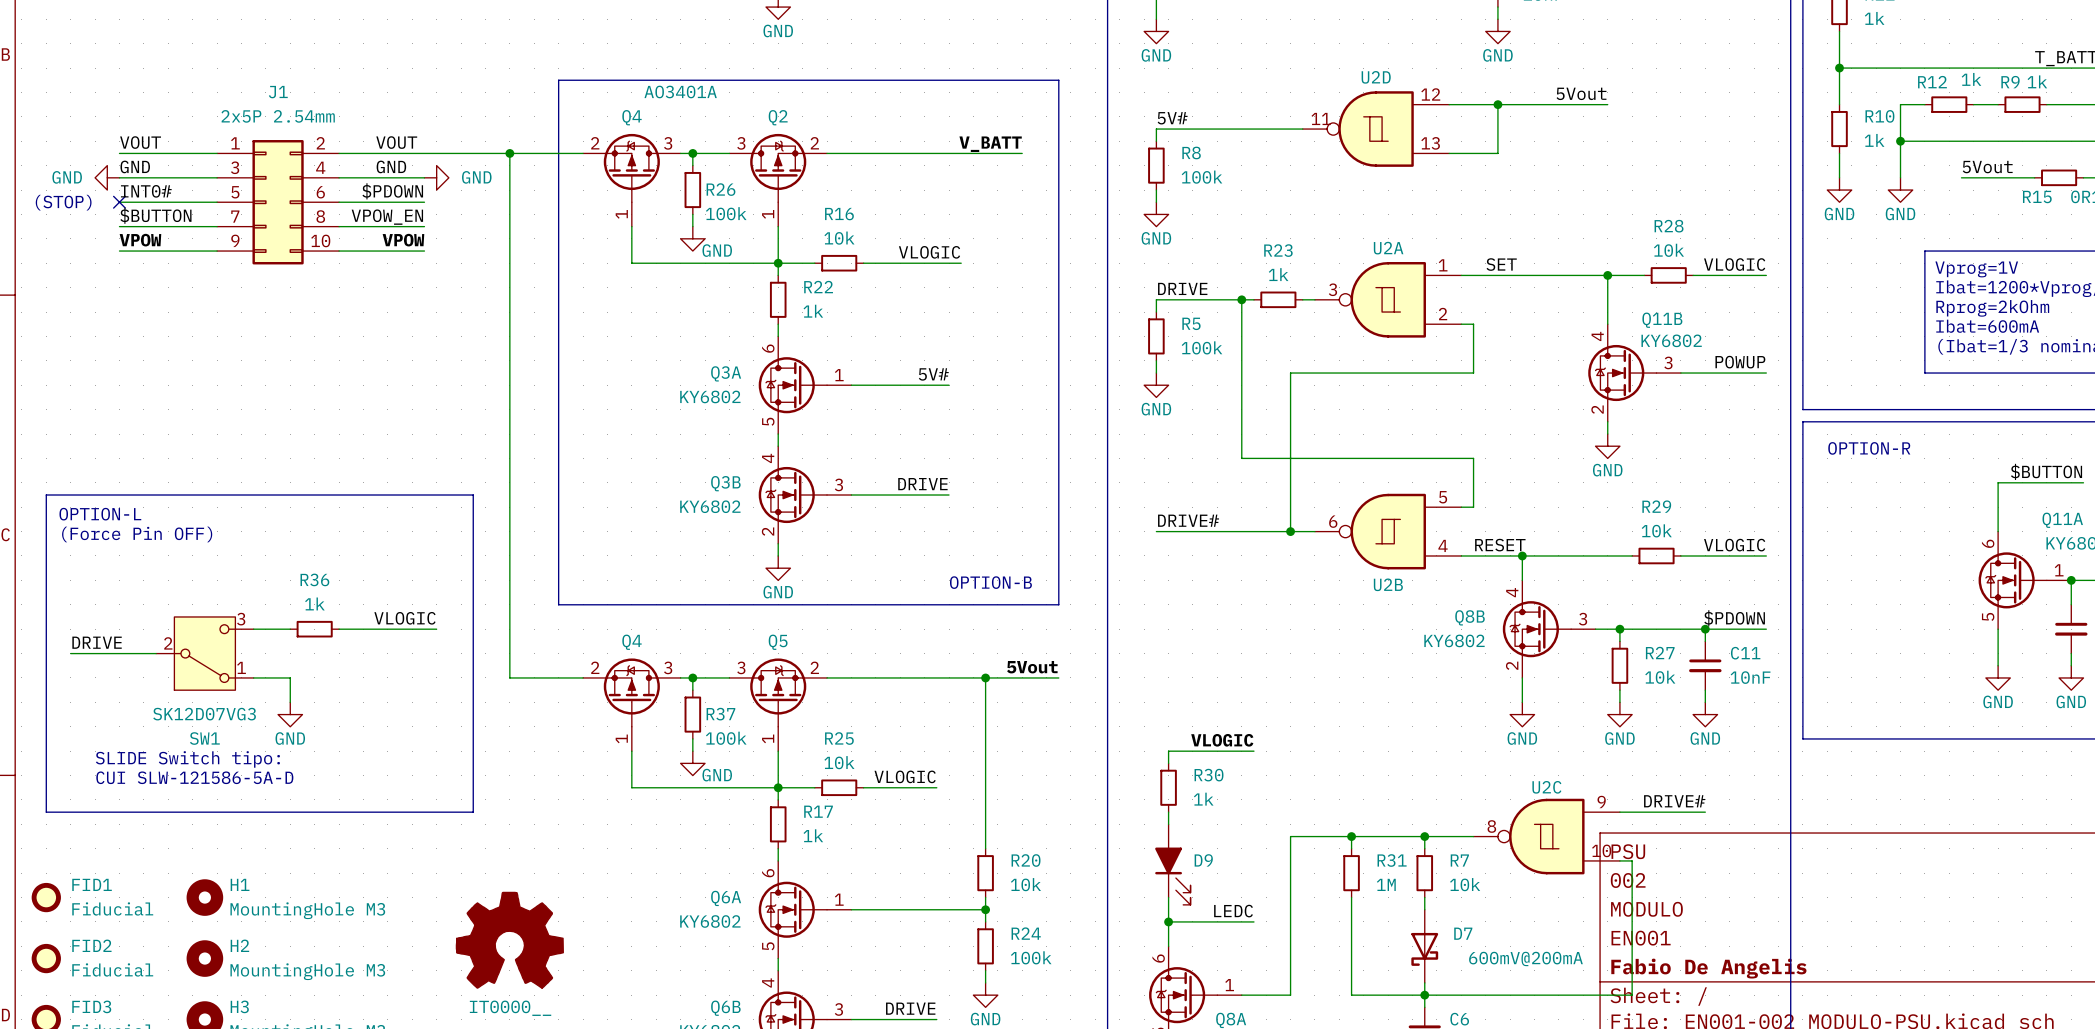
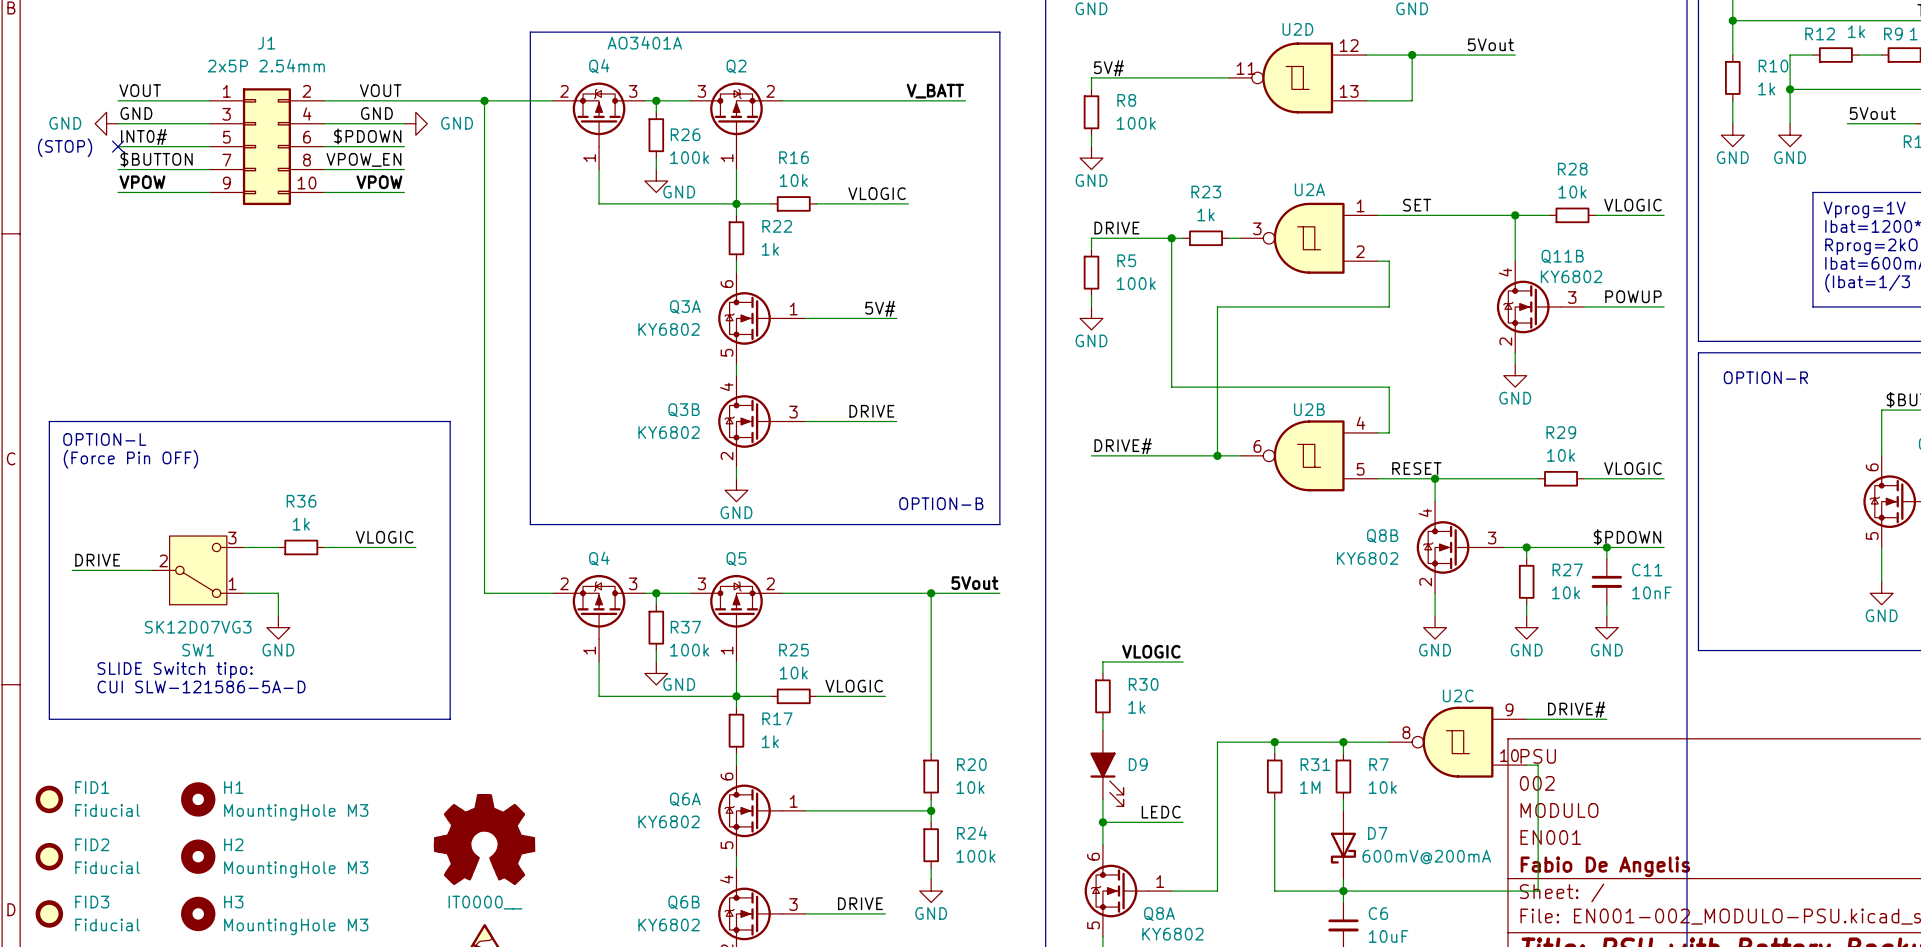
U2B flip: as is (1388, 531) -> up-down (1309, 455)

